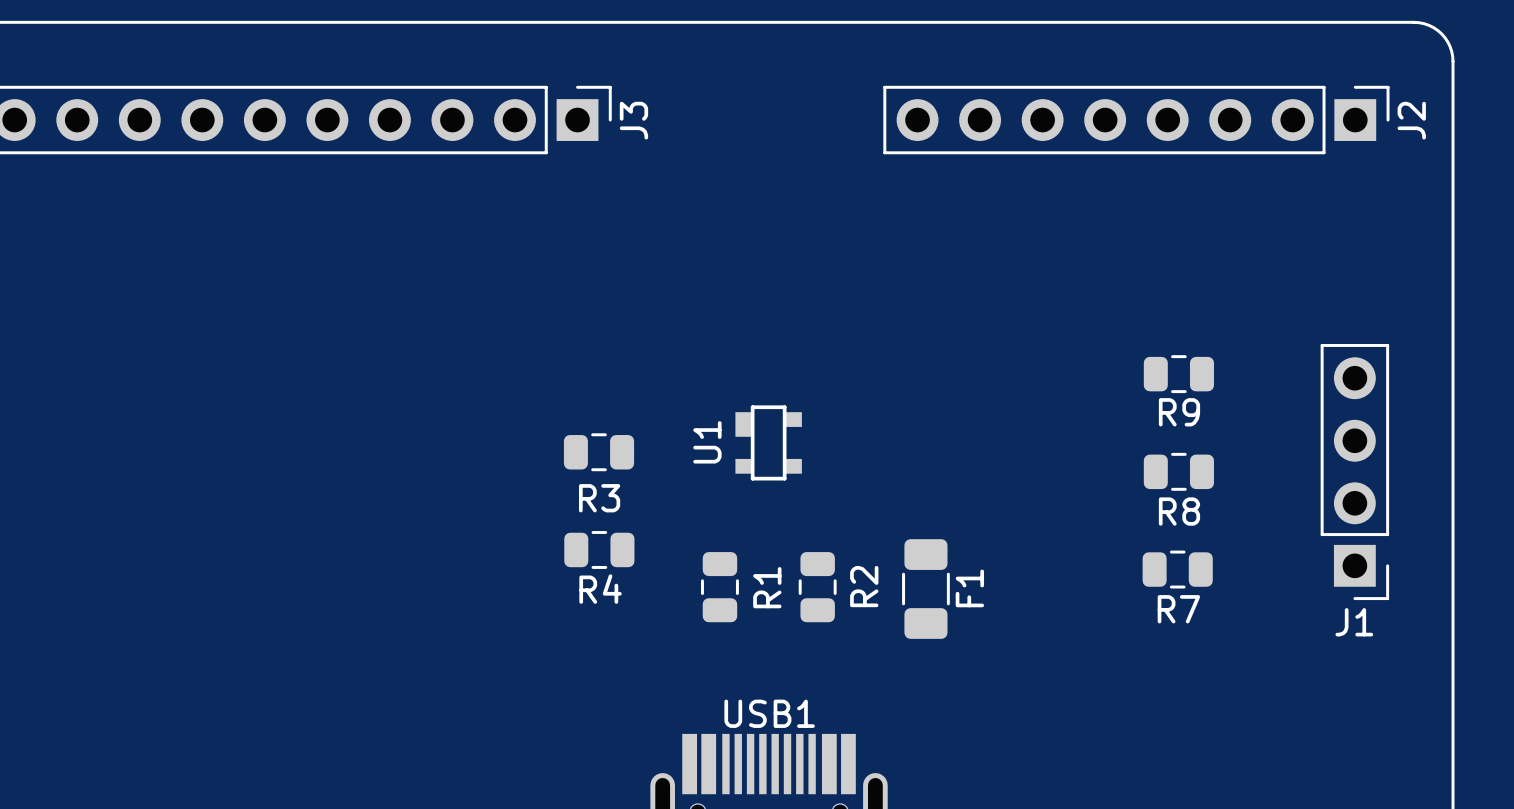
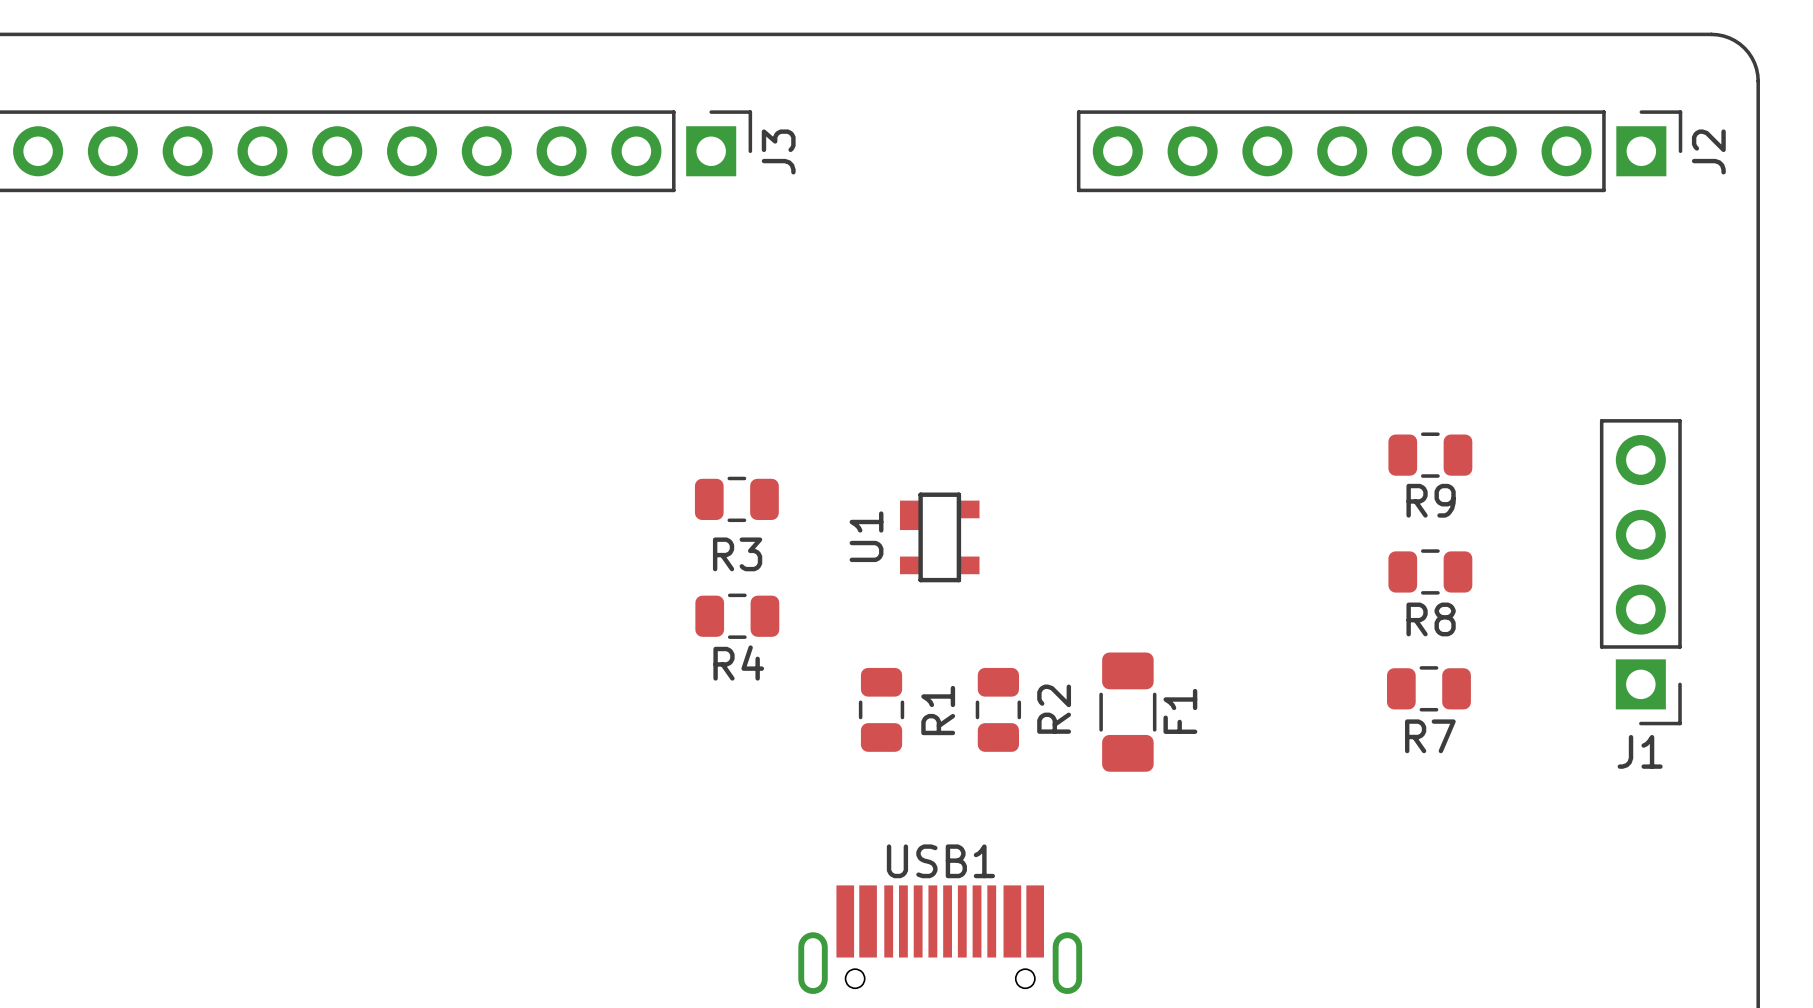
R3 position: (599, 452) -> (736, 499)
R4 position: (599, 549) -> (737, 616)

